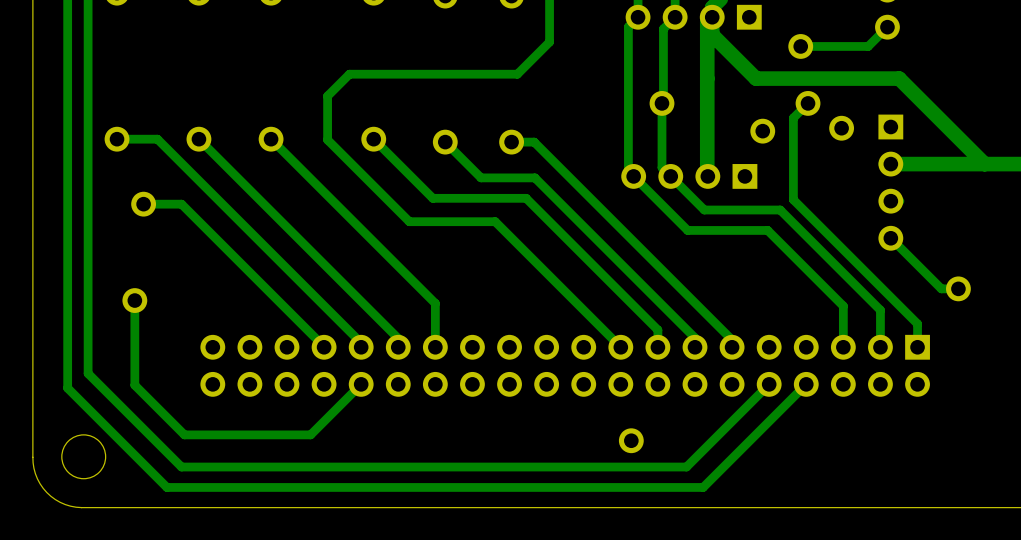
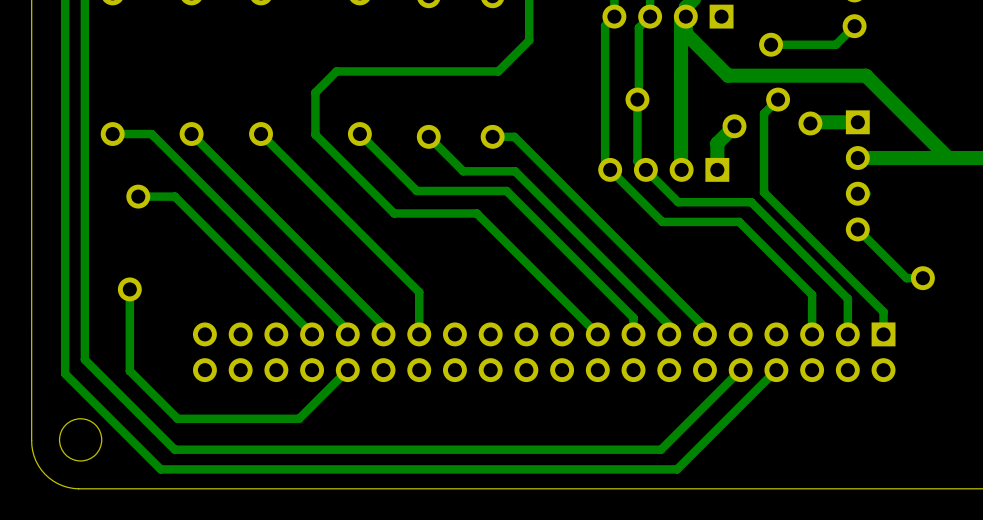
track: none -> (857, 122) (810, 123)
track: none -> (734, 126) (717, 143) (717, 169)
part: (631, 440) -> none

